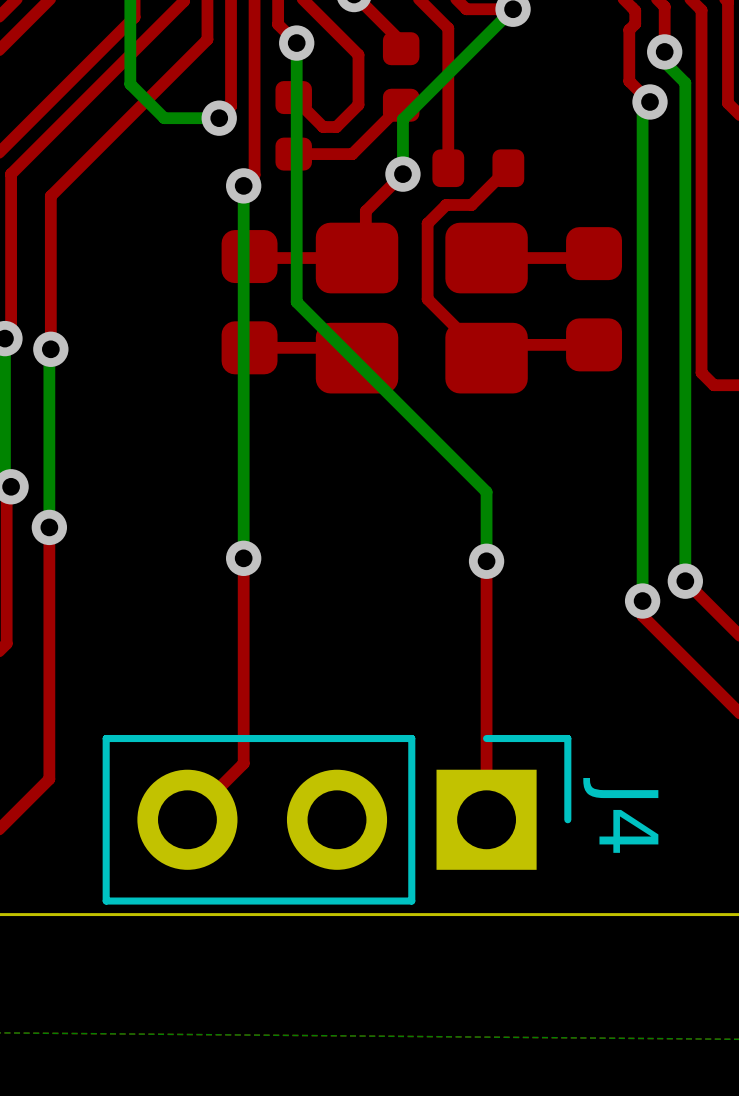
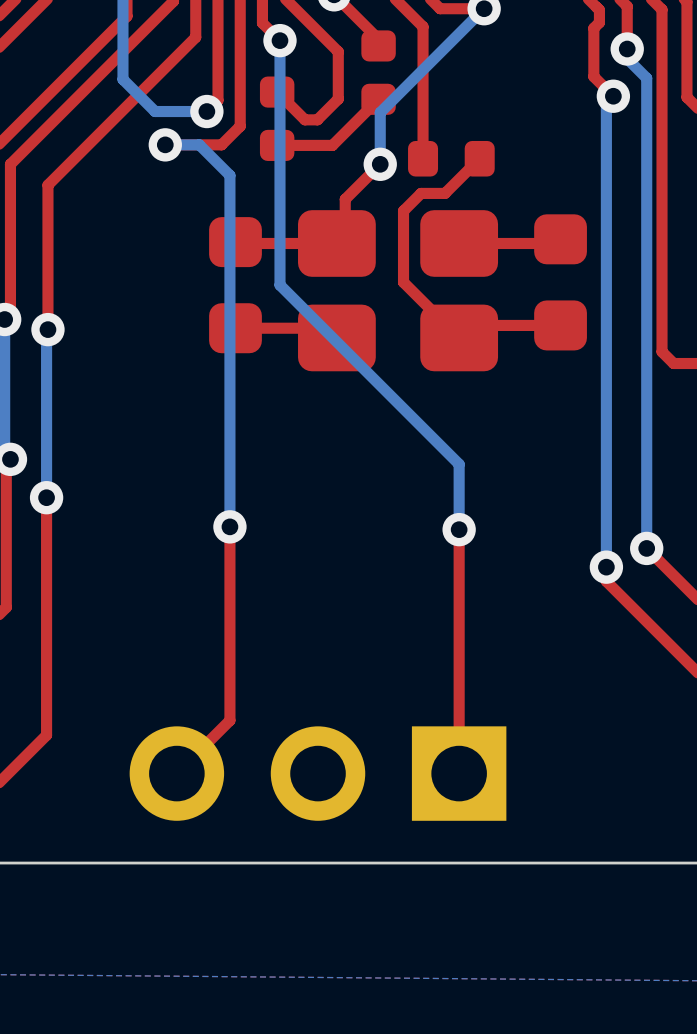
top track: (254, 133) (254, 175) (243, 185) -> (240, 126) (221, 144) (165, 144)
bottom track: none -> (165, 144) (199, 144) (229, 175)
via position: (243, 185) -> (165, 144)
J4 side: bottom (337, 819) -> top (318, 773)

